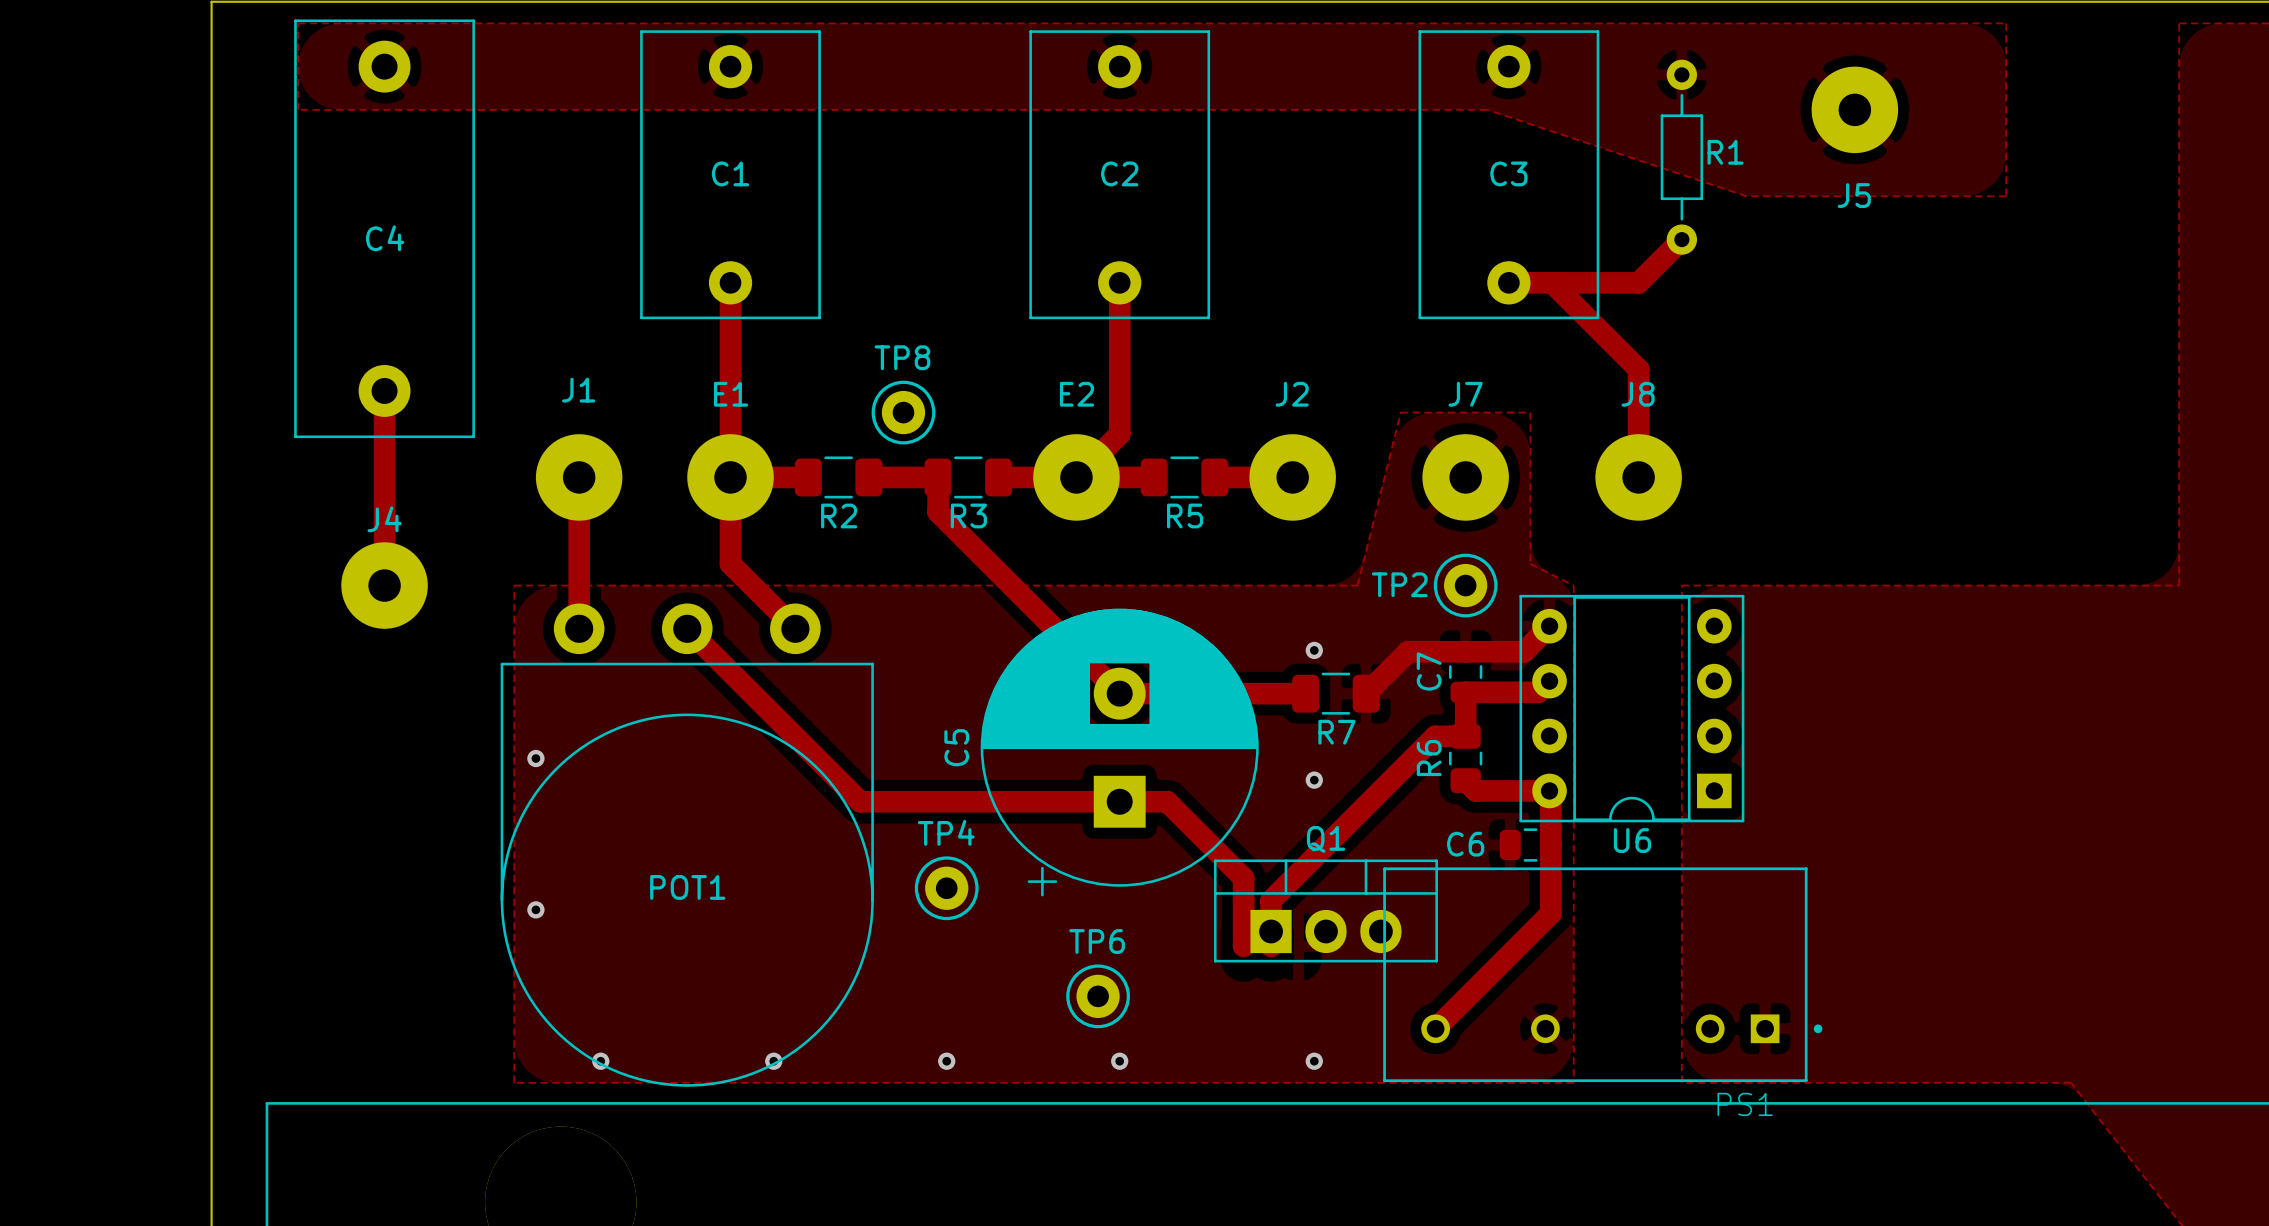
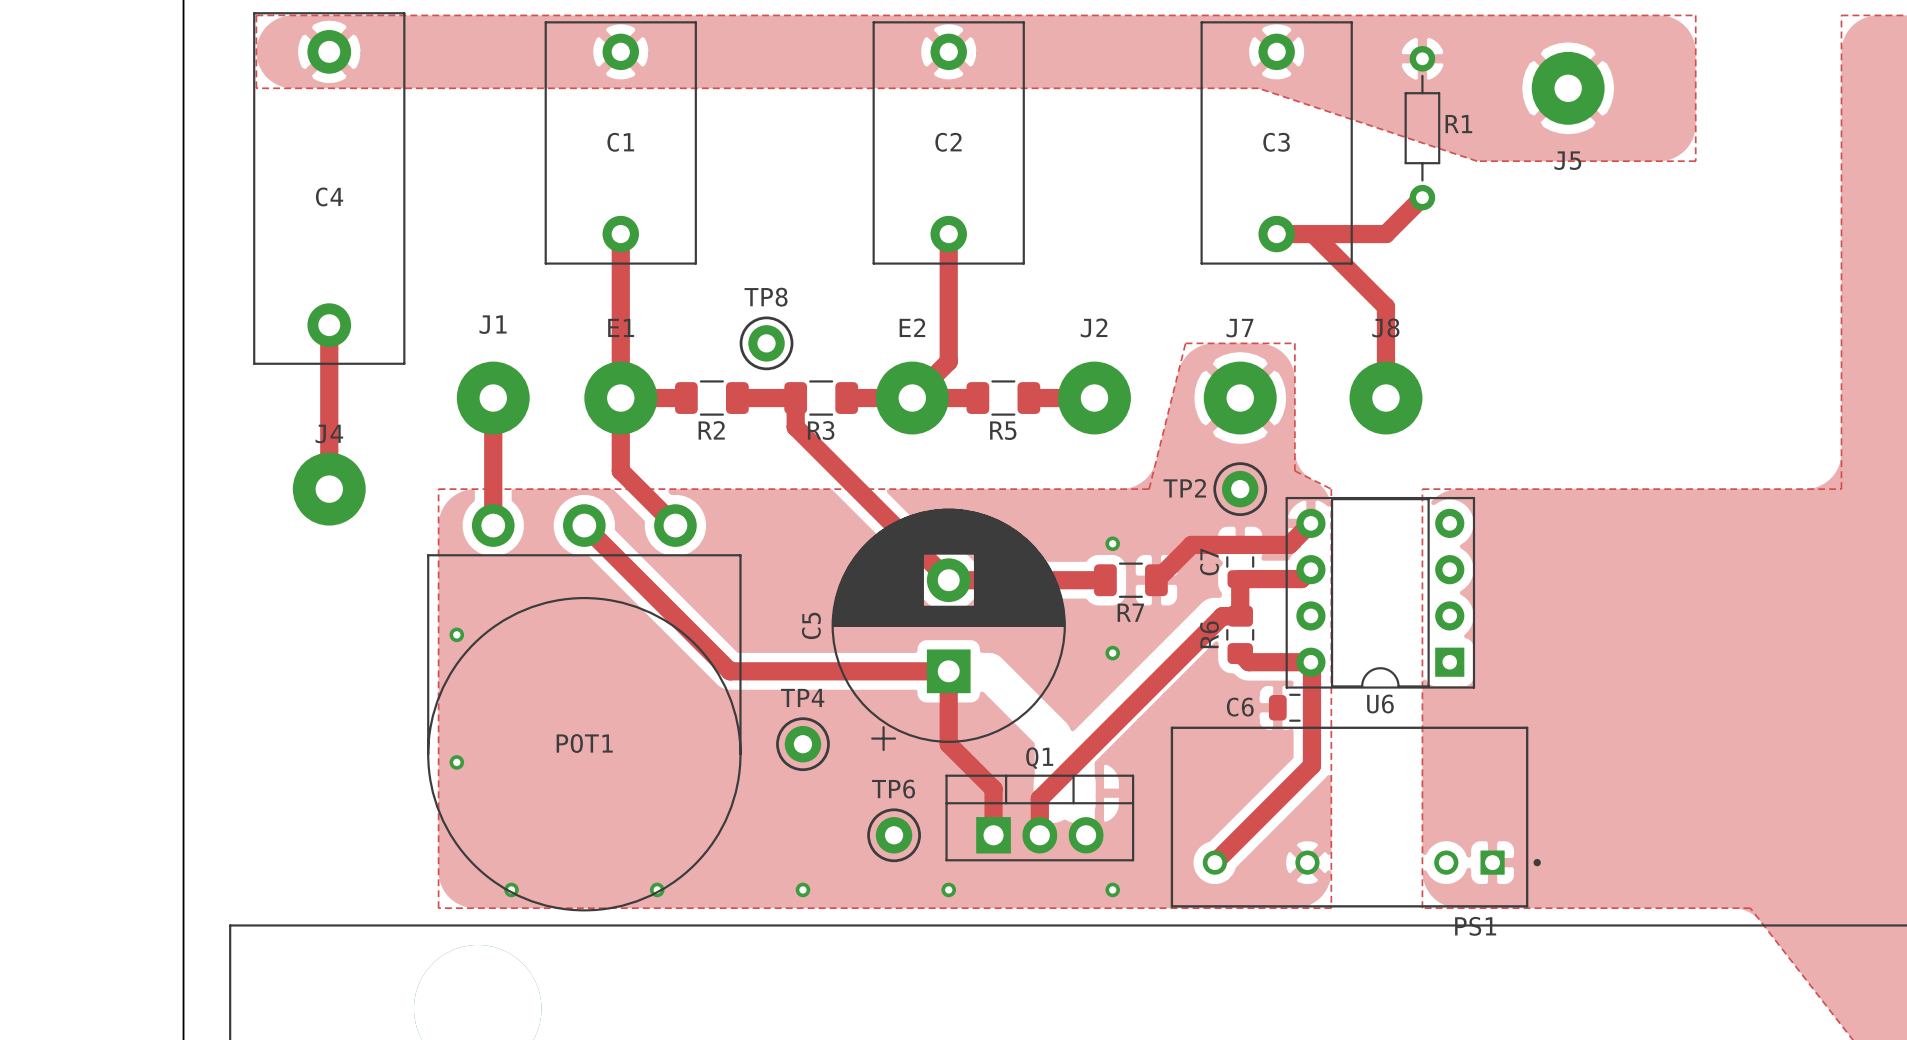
track: (1444, 736) (1435, 736) (1271, 900) (1271, 946) -> (1222, 616) (1039, 798) (1039, 835)
track: (1119, 801) (1167, 801) (1243, 878) (1243, 946) -> (948, 671) (948, 744) (993, 789) (993, 835)
Q1 position: (1325, 910) -> (1039, 817)
TP6 position: (1098, 996) -> (894, 835)

